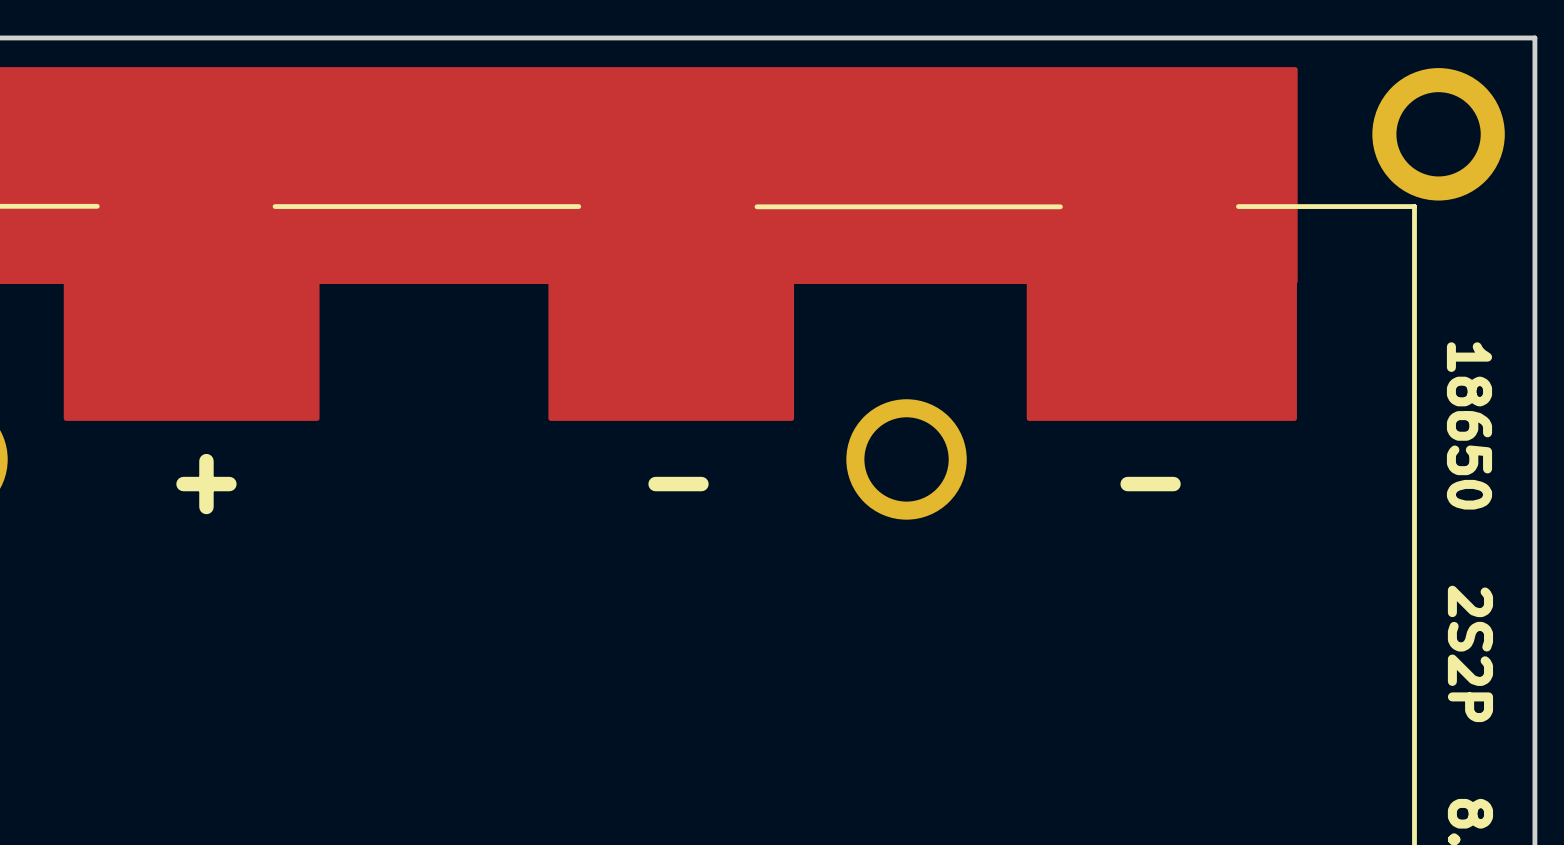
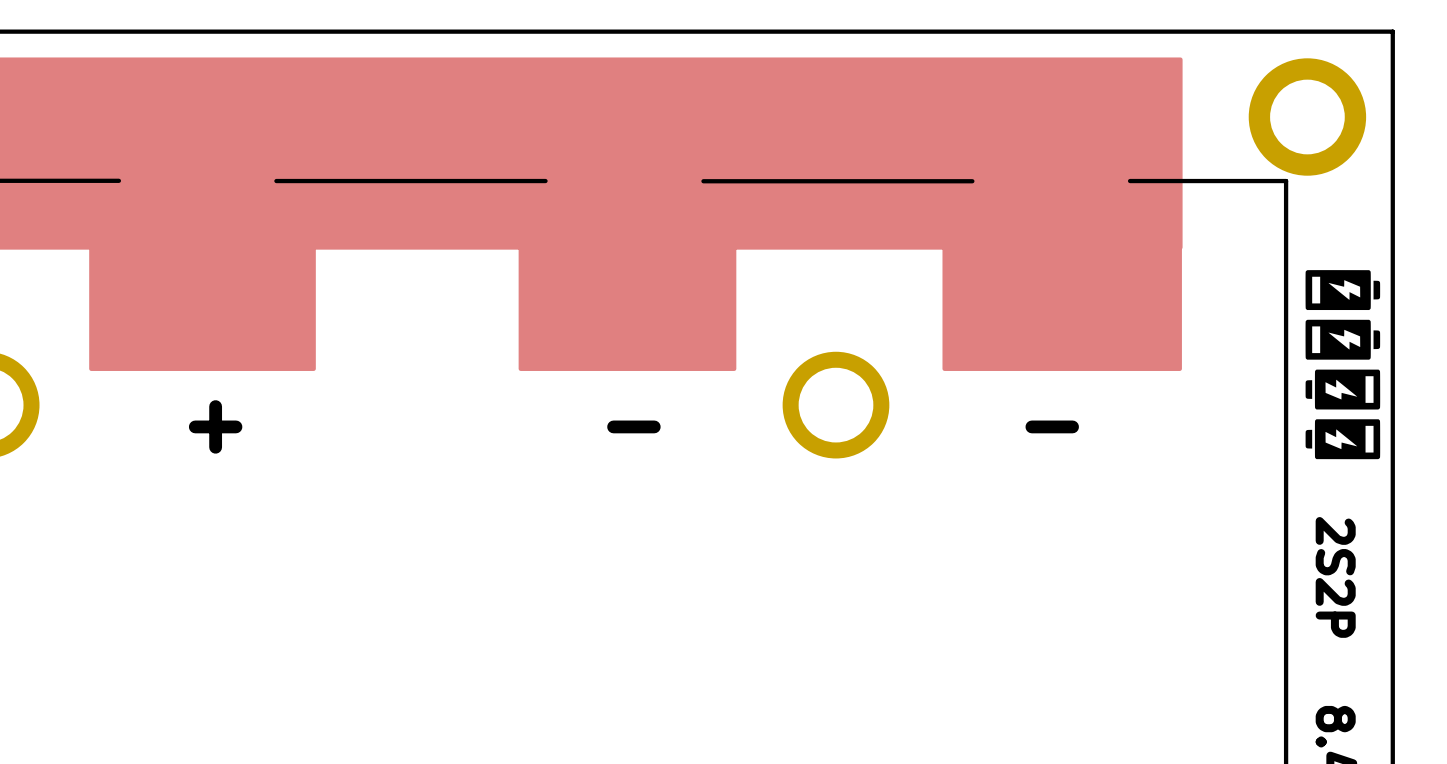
drawing: none -> [1305, 270, 1381, 460]
text: 18650 (1469, 425) -> none

